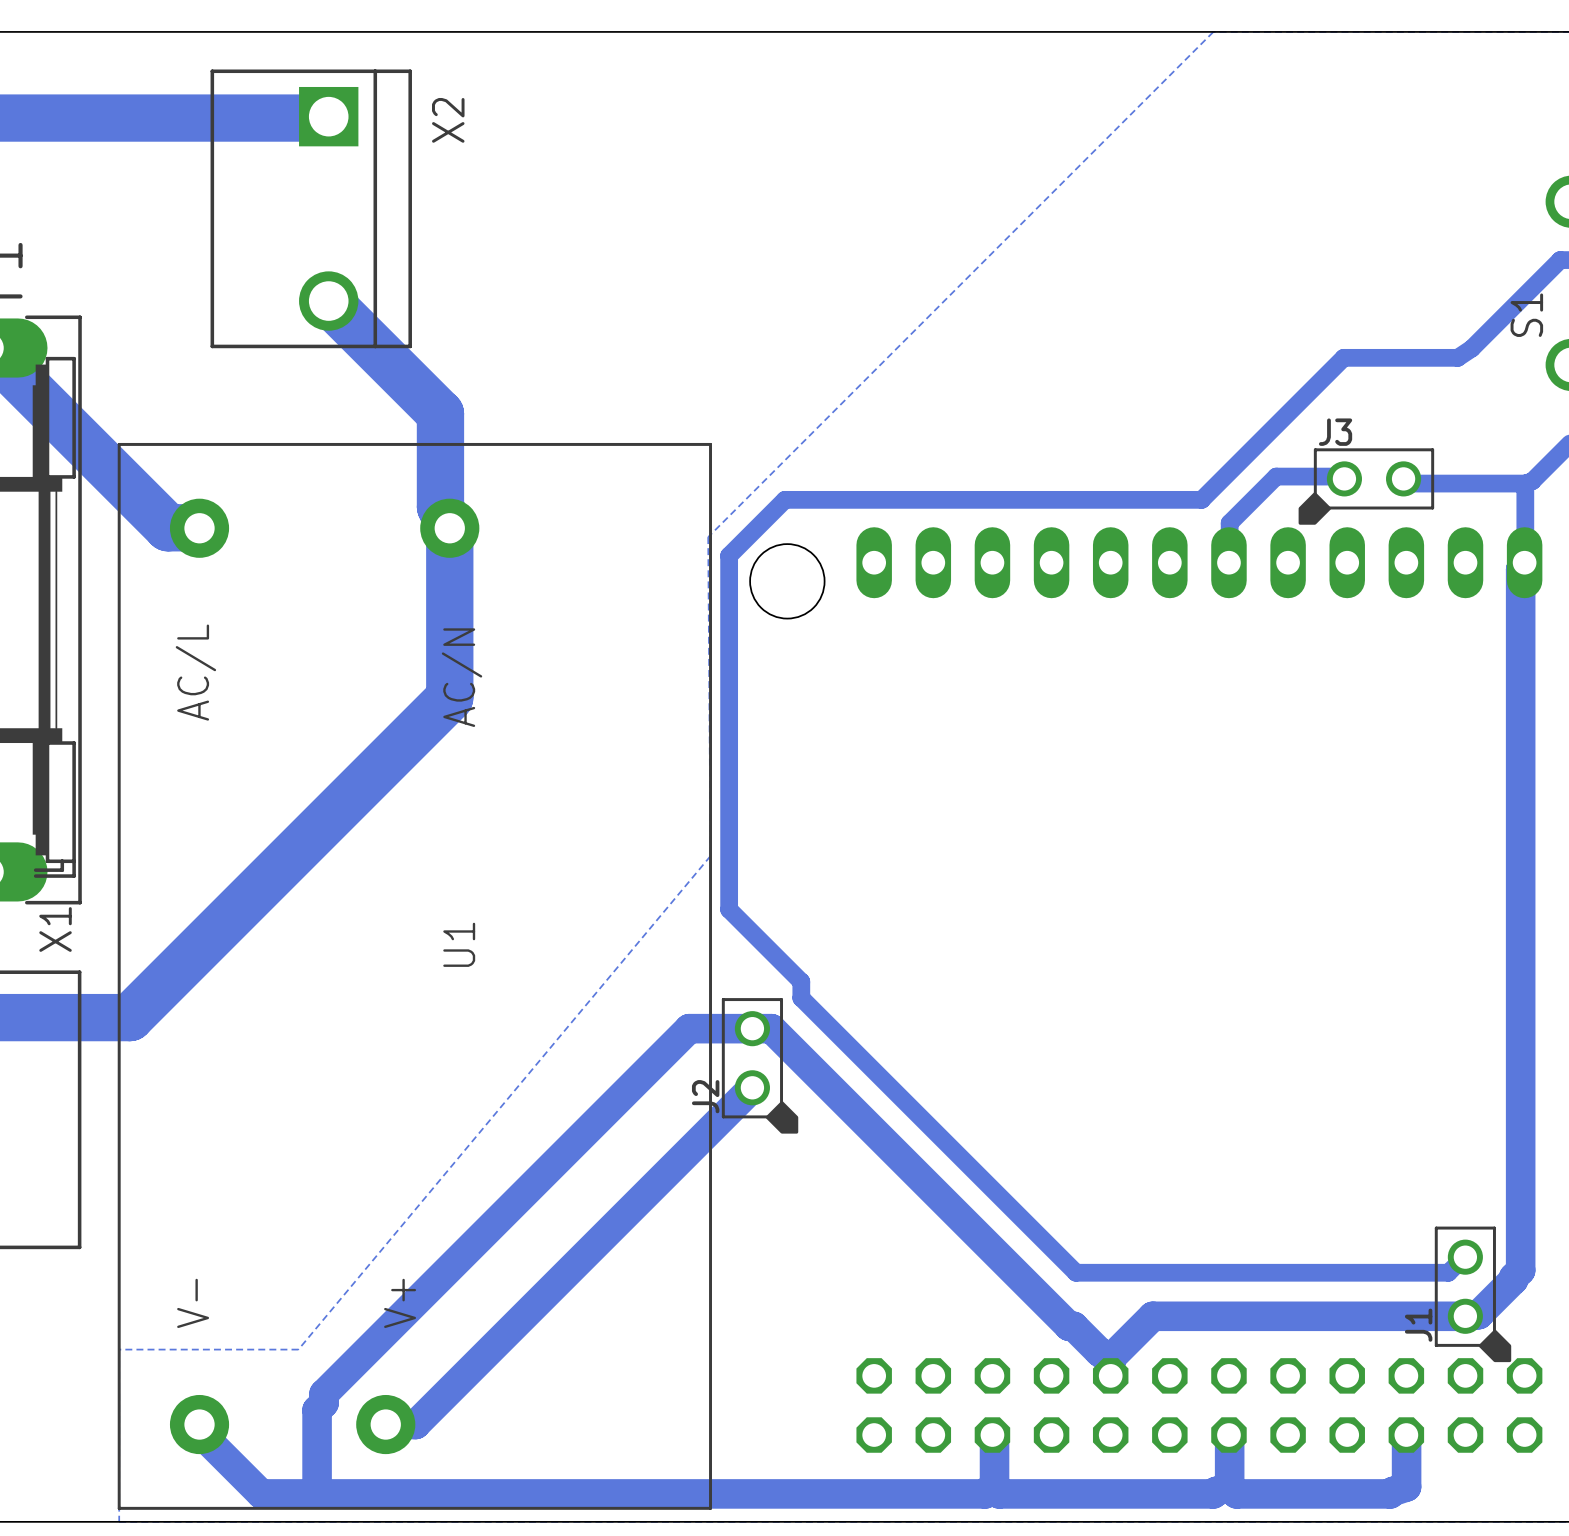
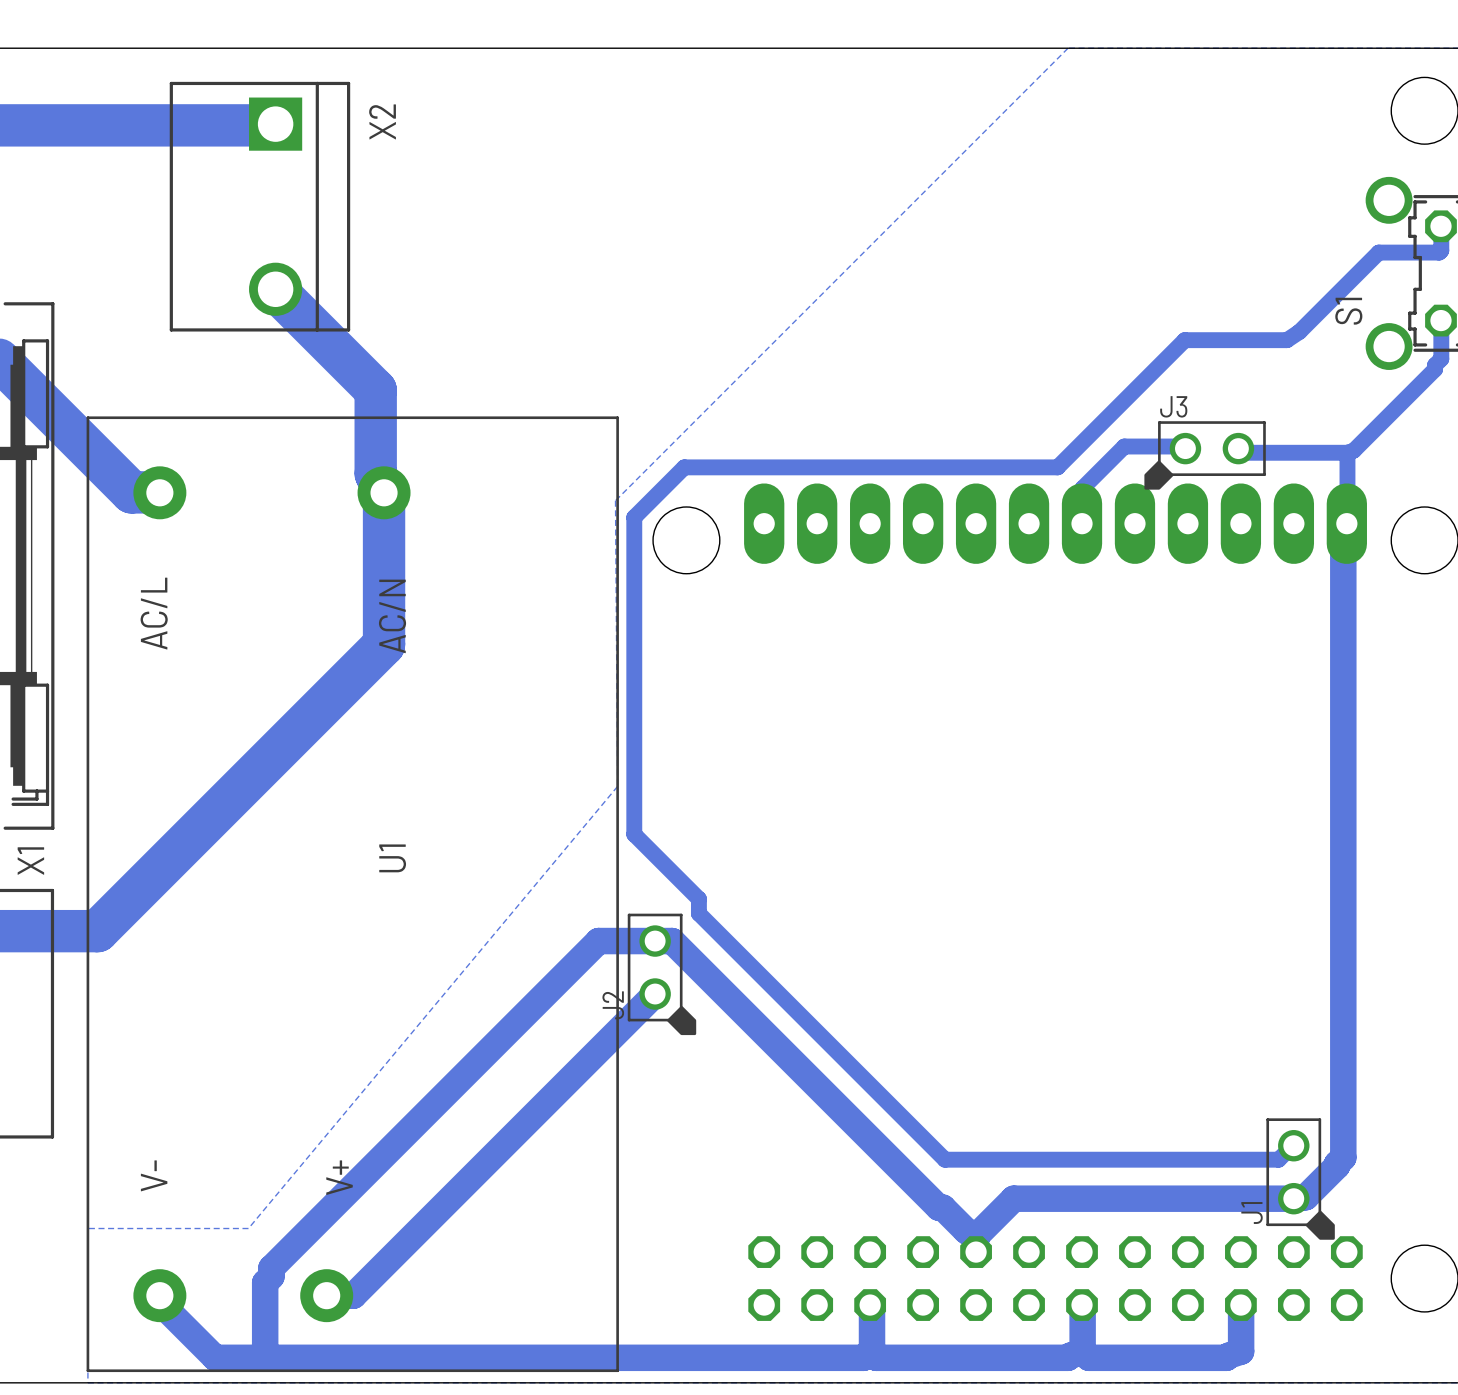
part footprint: [856, 527, 1543, 599] -> [744, 483, 1367, 564]

